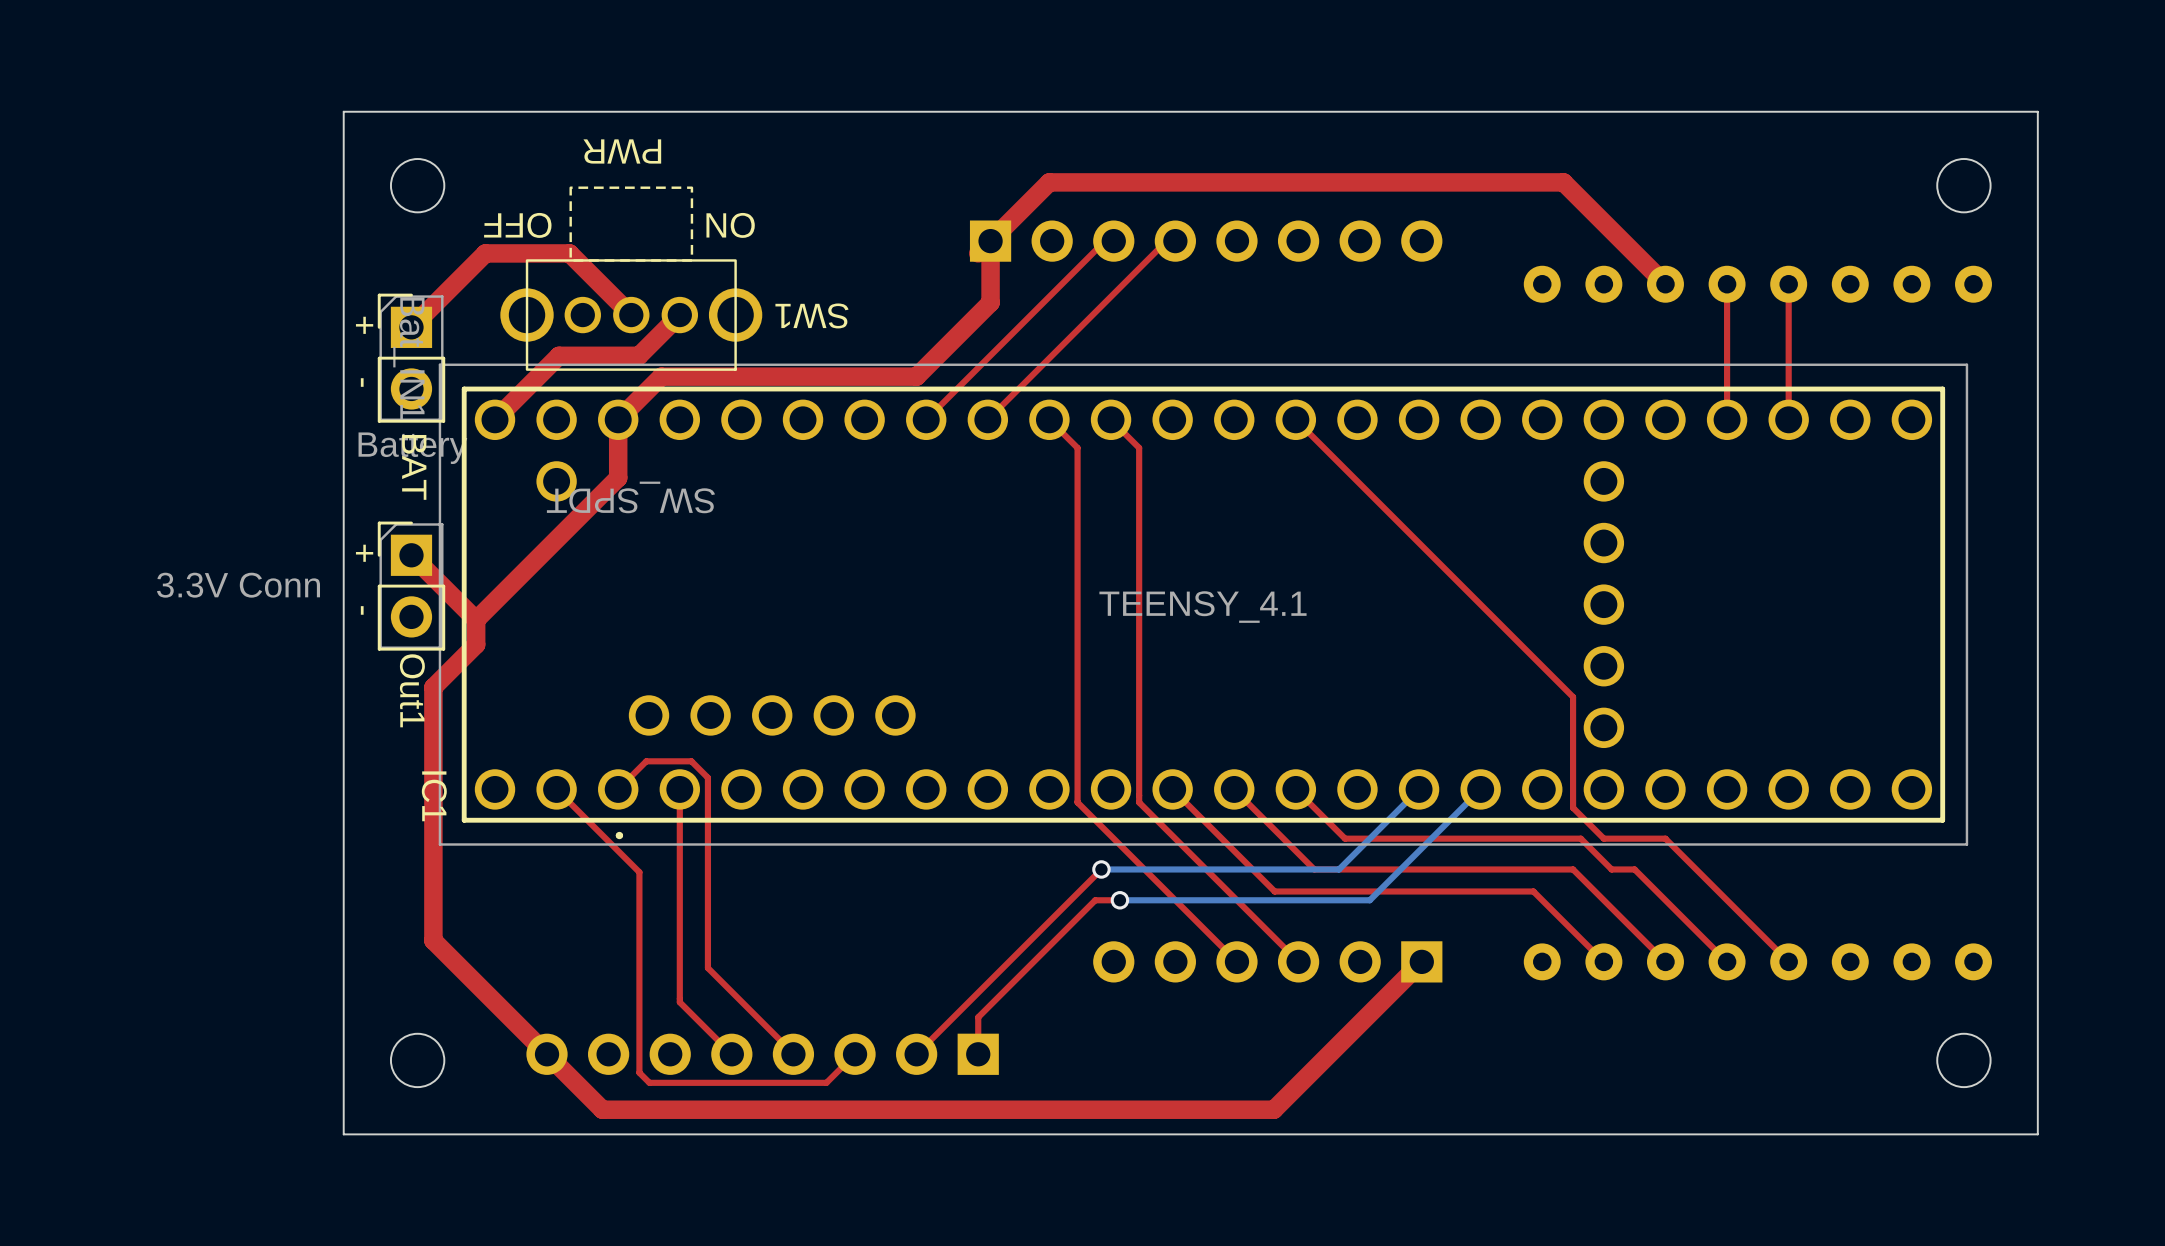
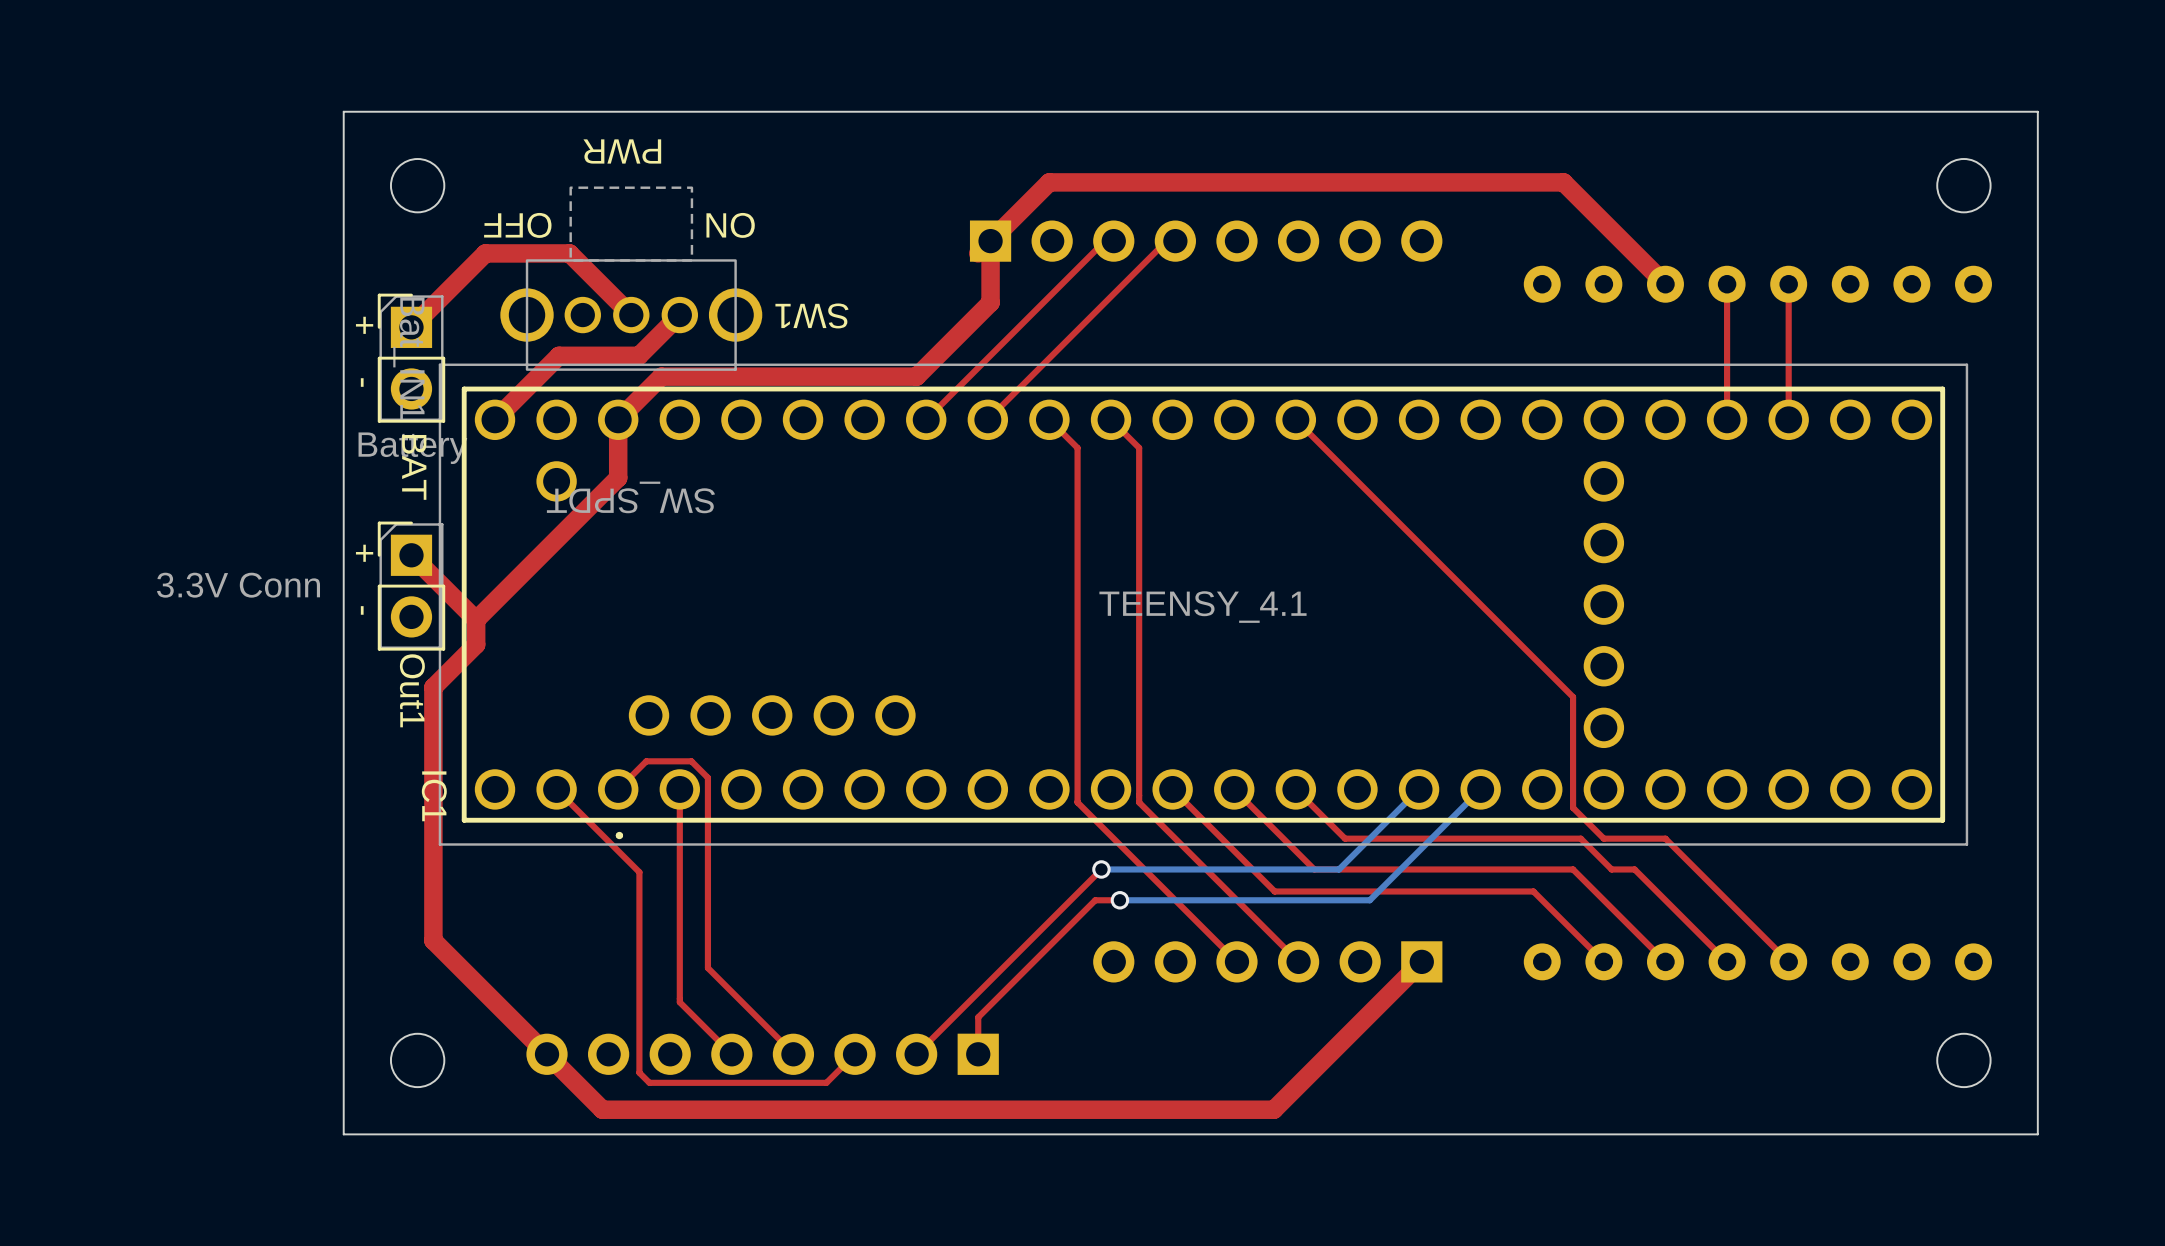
SW1 footprint: [500, 186, 763, 371] -> [500, 186, 763, 371]

